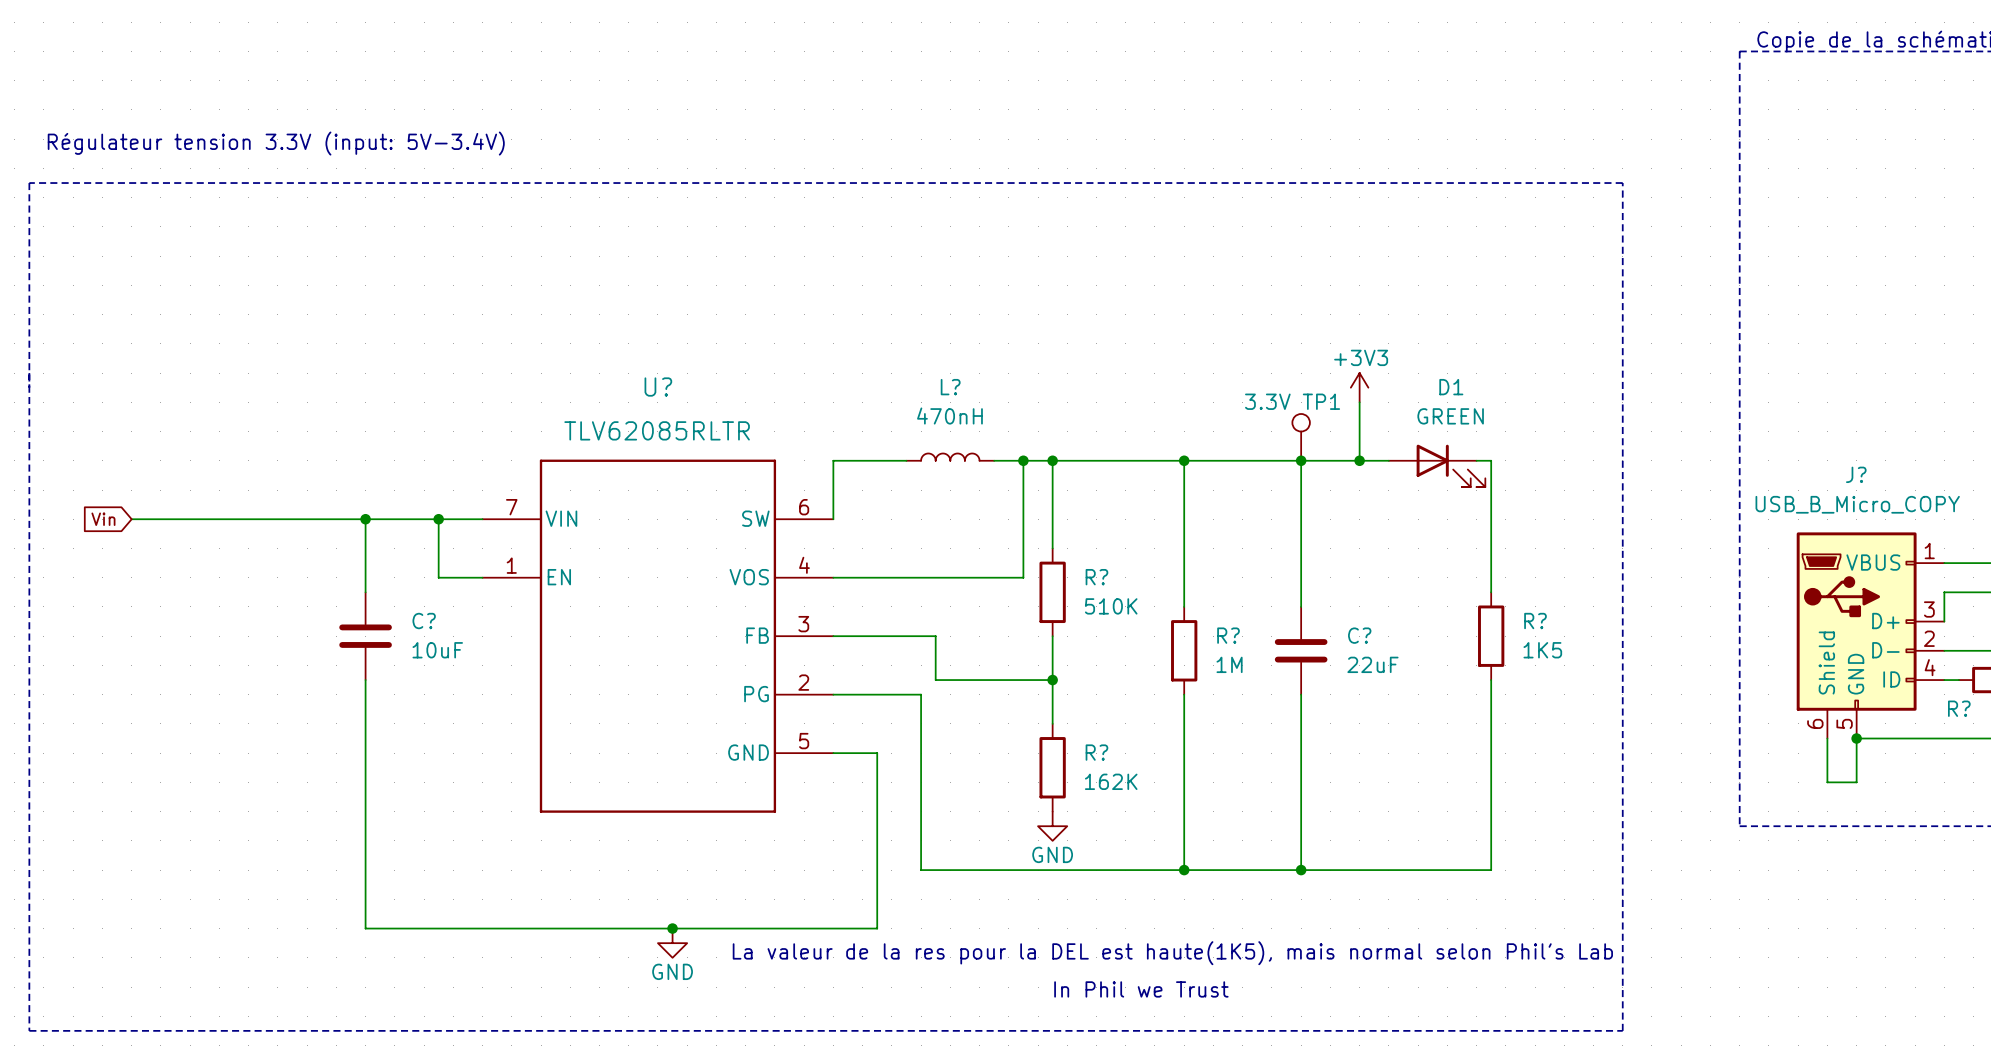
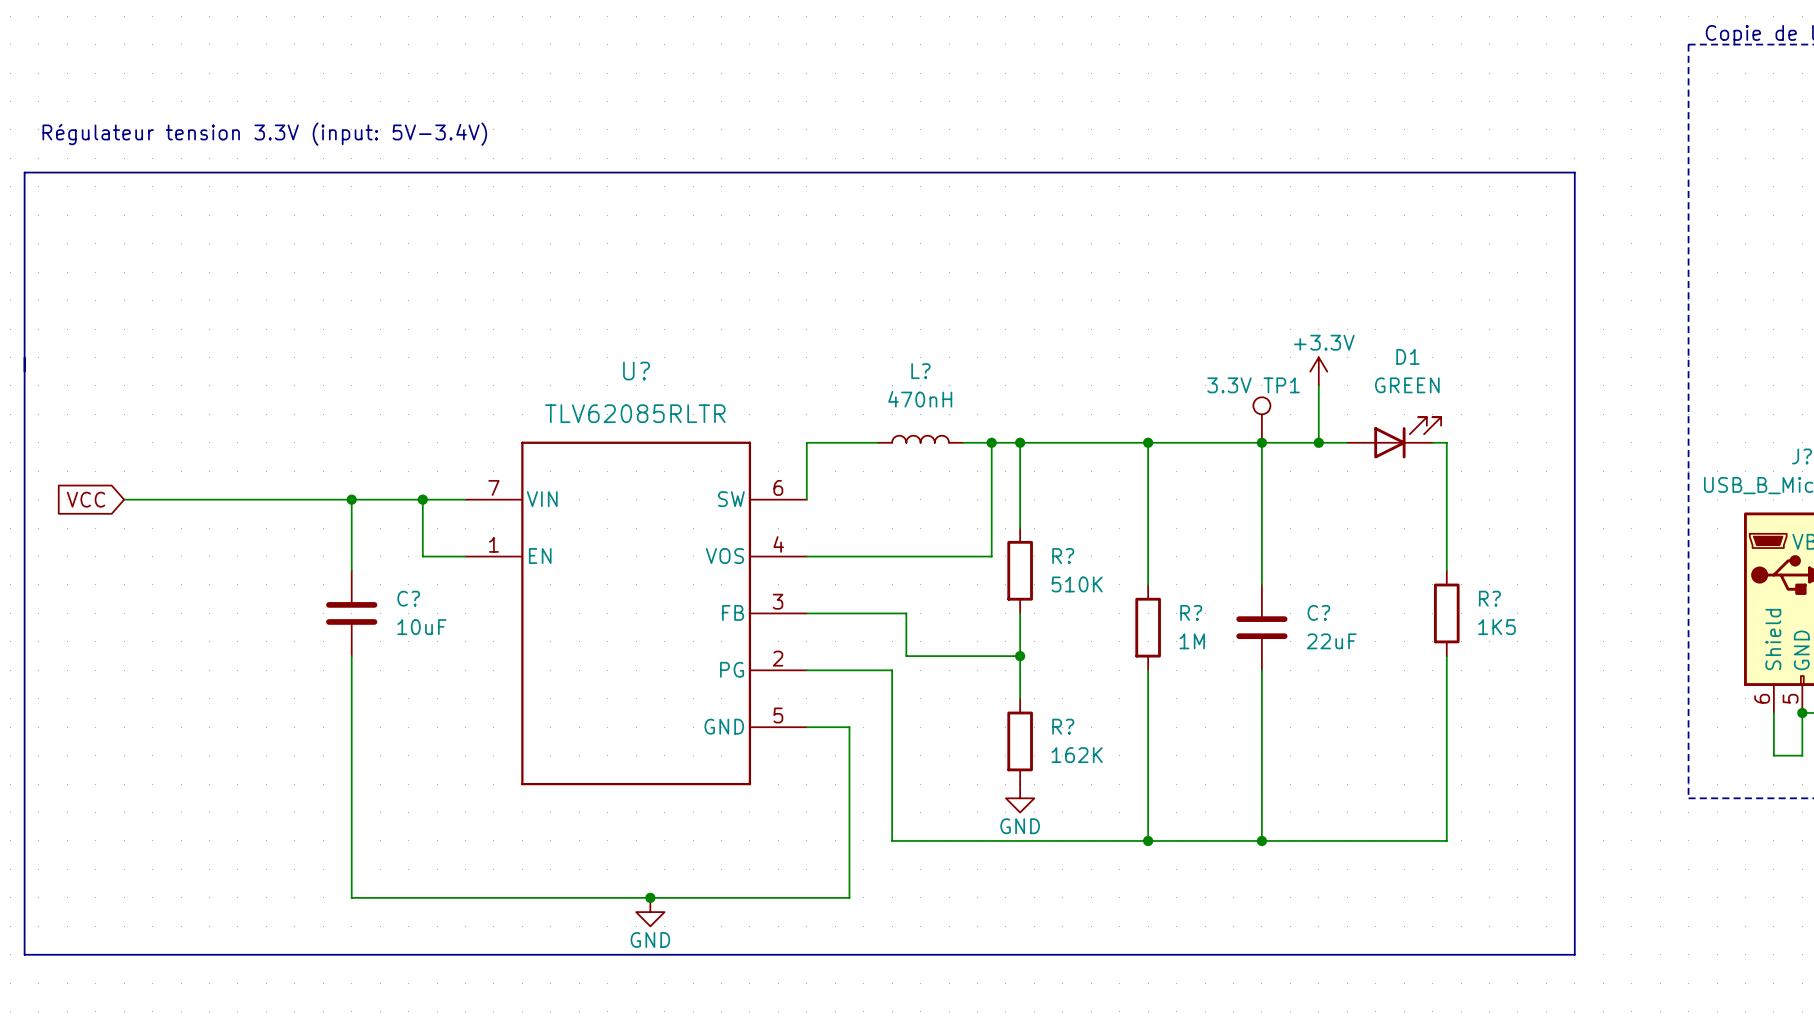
line: (29, 183) (1622, 183) (1622, 1030) (29, 1030) (29, 183) -> (24, 172) (24, 954) (1574, 954) (1574, 172) (24, 172)
power symbol: +3V3 (1359, 387) -> +3.3V (1318, 371)
D1 flip: as is (1450, 465) -> up-down (1407, 437)
global label: Vin (103, 519) -> VCC (86, 499)
text: La valeur de la res pour la DEL est haute(1K5), mais normal selon Phil's Lab (1172, 953) -> none
text: In Phil we Trust (1141, 989) -> none

